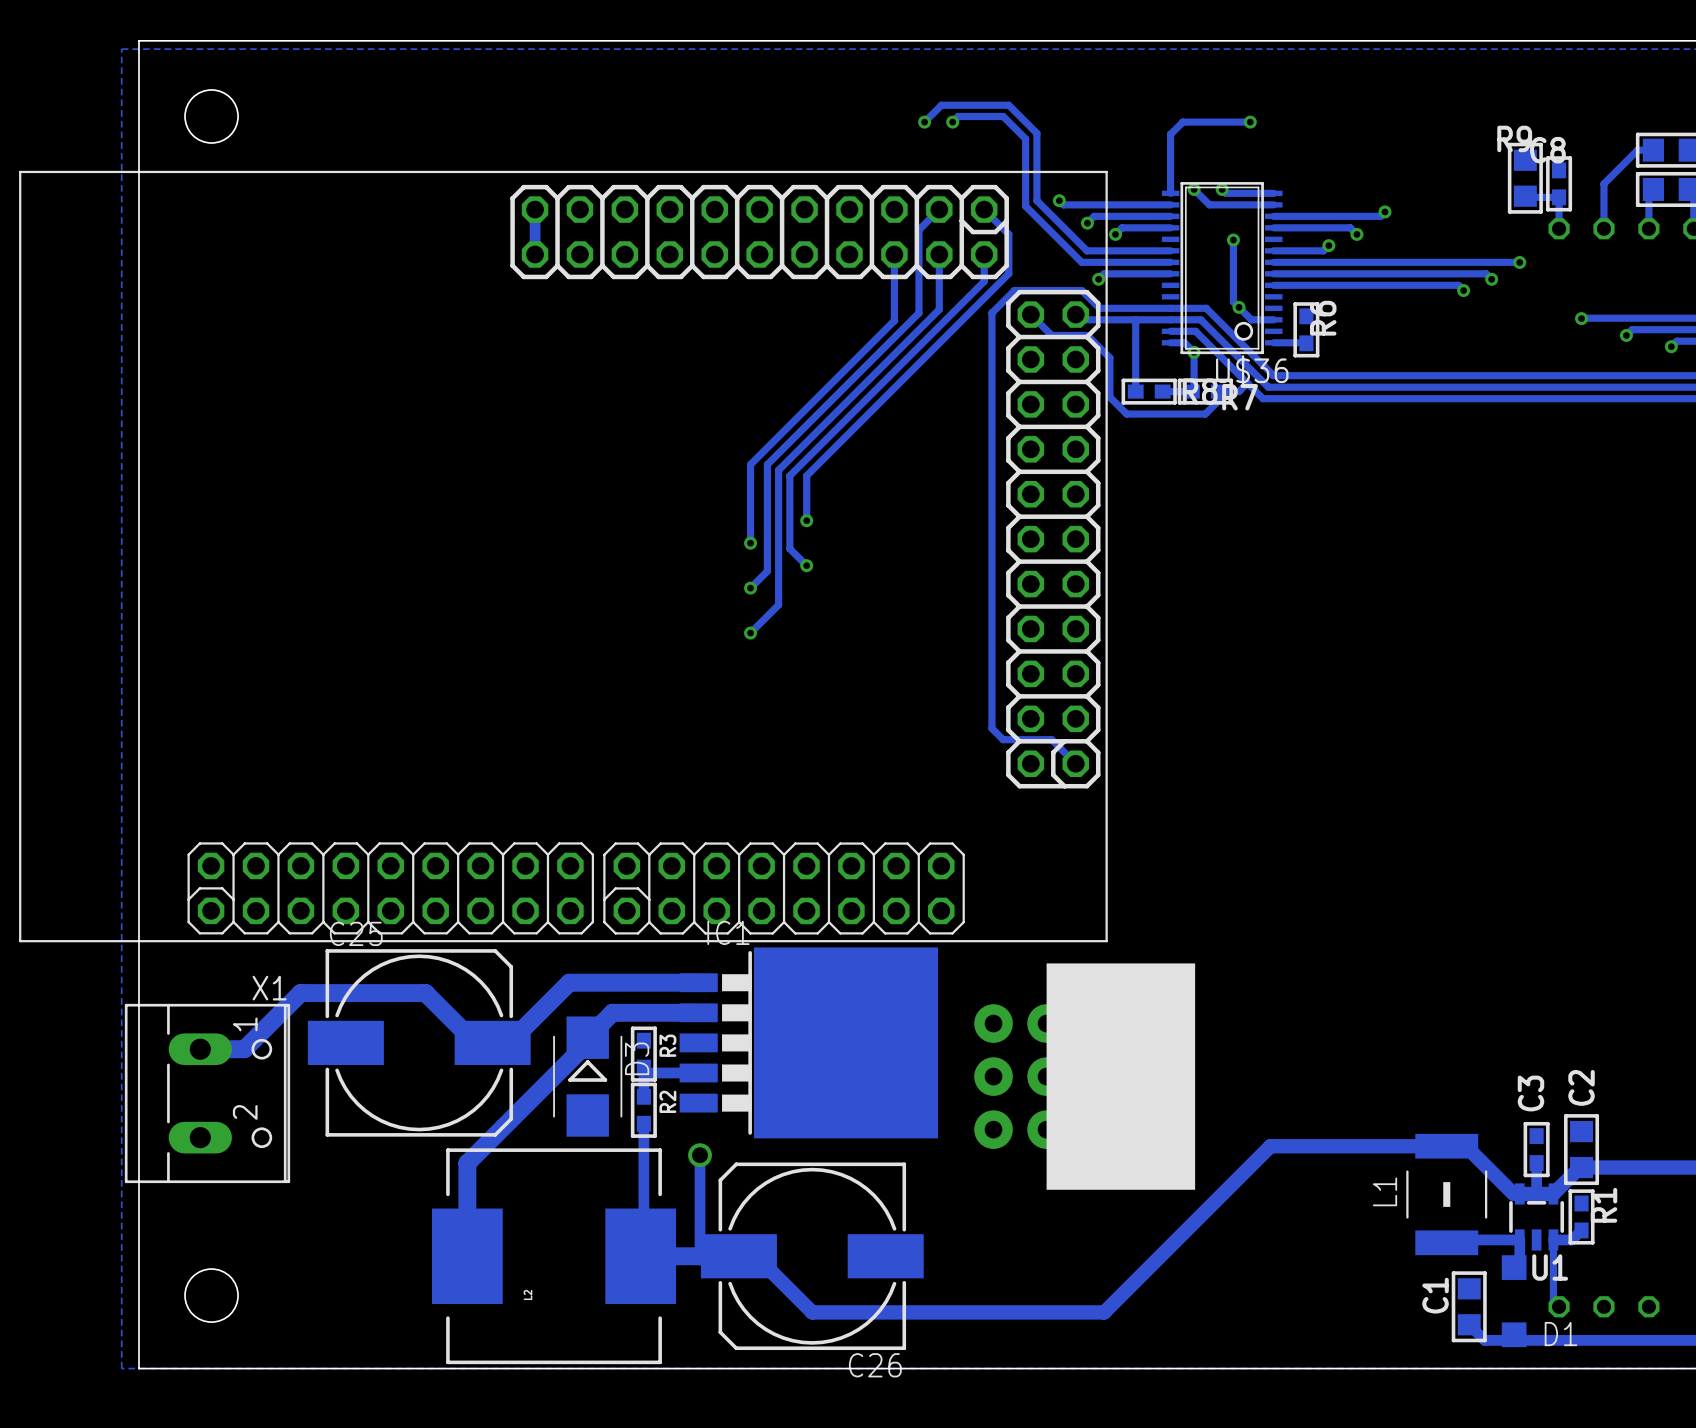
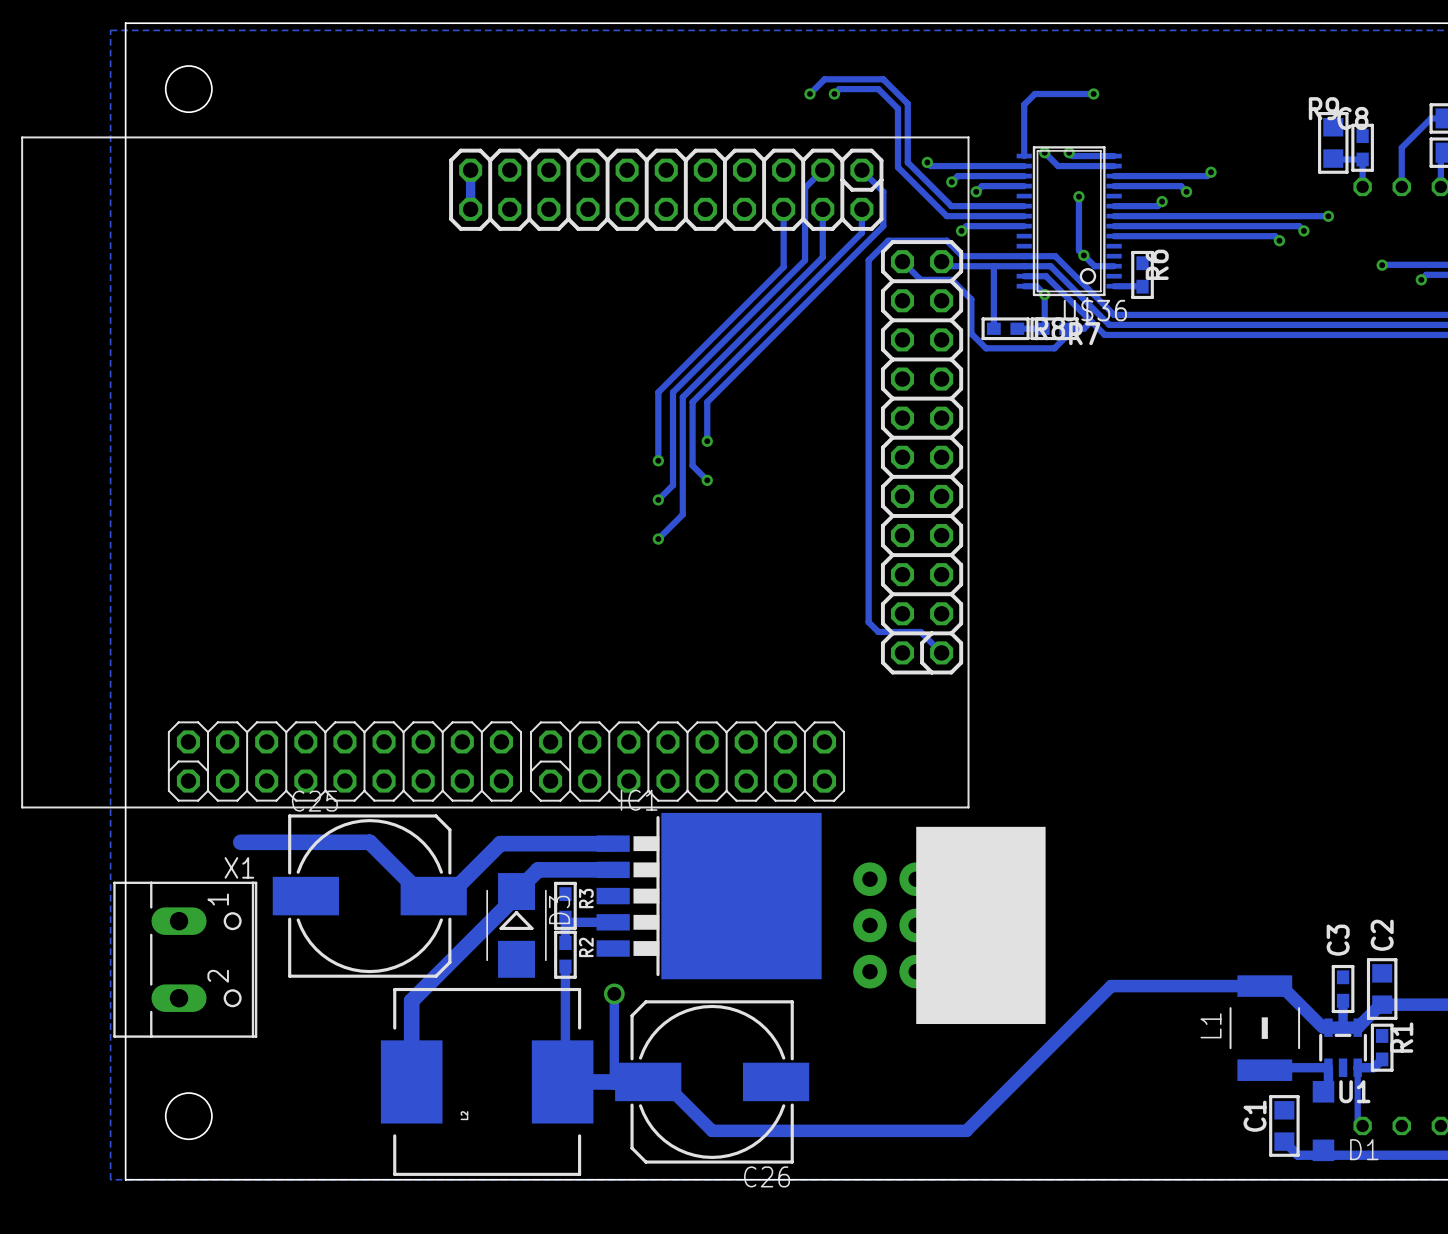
track: (492, 1042) (475, 1042) (425, 993) (300, 993) (244, 1049) (200, 1049) -> (433, 896) (428, 900) (369, 842) (240, 842)
X1 position: (207, 1093) -> (185, 959)

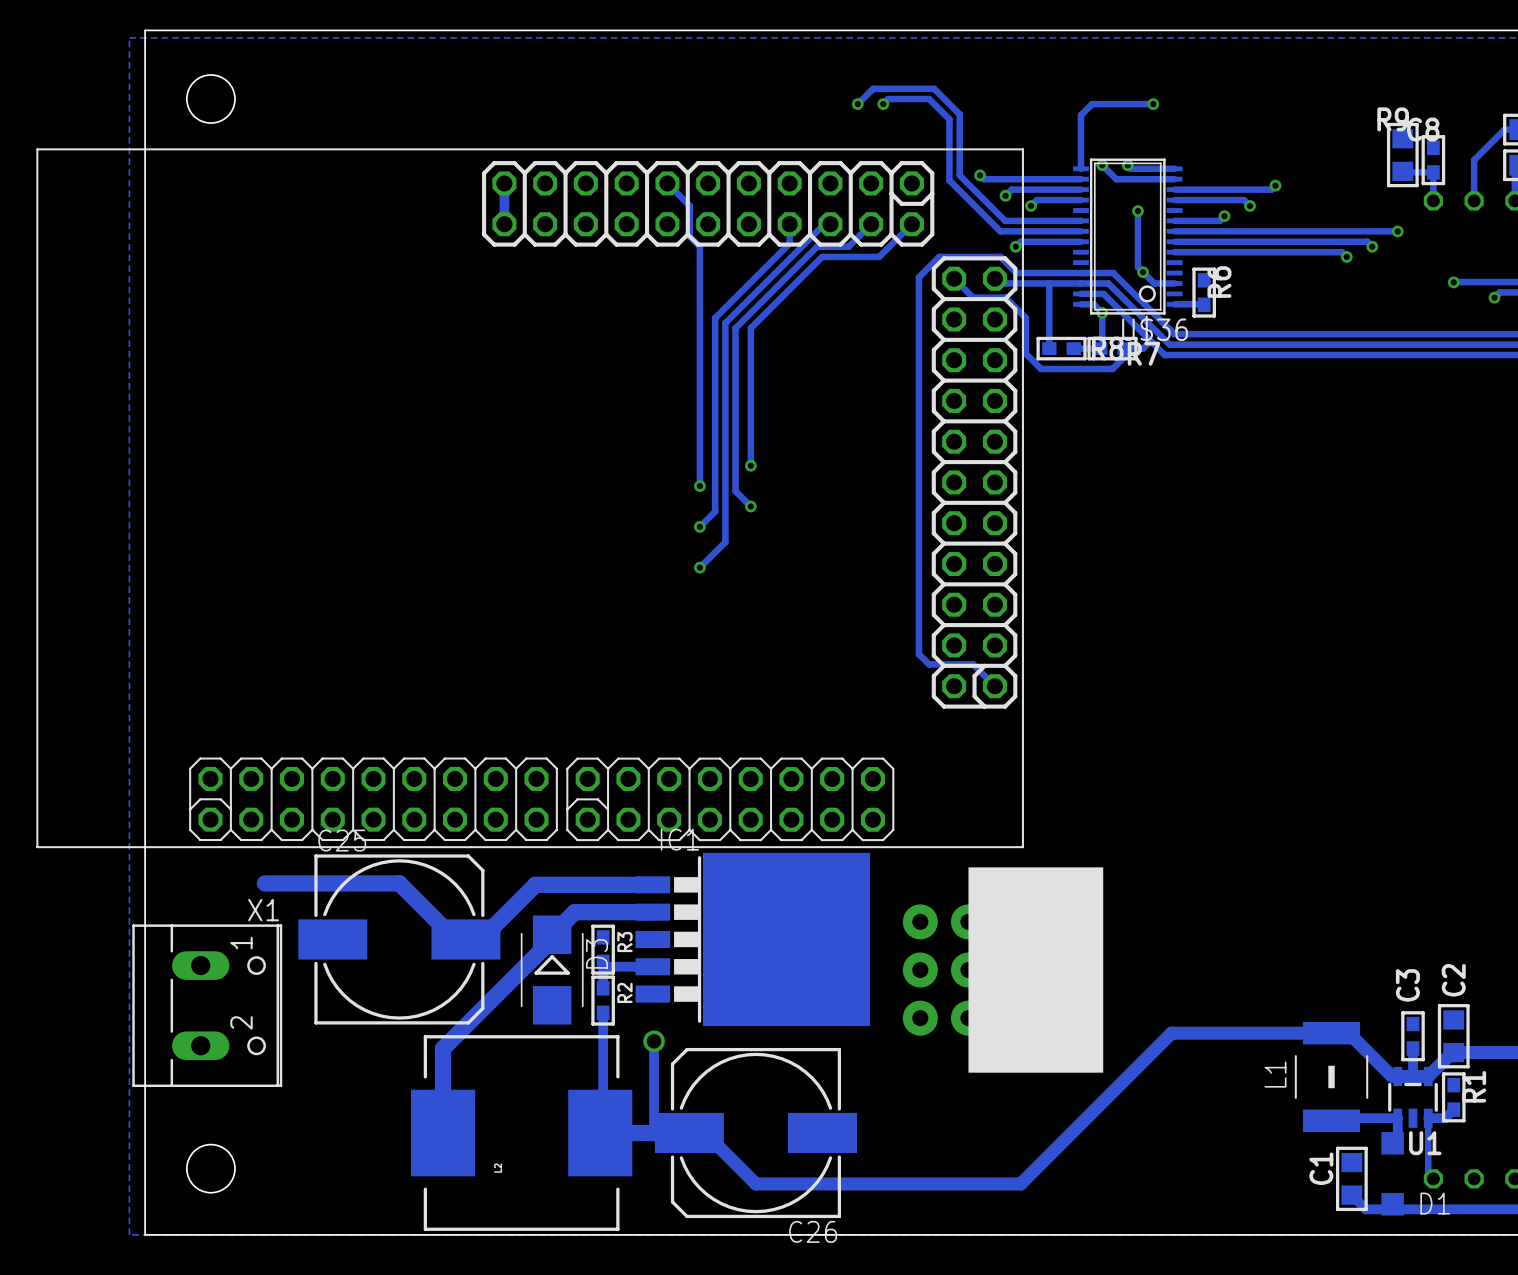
track: none -> (667, 183) (689, 205) (689, 236) (699, 246) (699, 414)
track: (822, 170) (805, 187) (805, 260) (673, 392) -> (789, 224) (789, 243) (715, 318) (715, 414)
track: (861, 170) (883, 191) (883, 226) (707, 402) -> none
track: (783, 209) (783, 267) (658, 392) -> (830, 224) (824, 224) (725, 323) (725, 419)
track: (822, 209) (822, 257) (682, 397) -> (871, 224) (848, 246) (817, 246) (735, 328) (735, 425)
track: (861, 209) (861, 232) (692, 402) -> (911, 224) (879, 256) (822, 256) (750, 328) (750, 425)

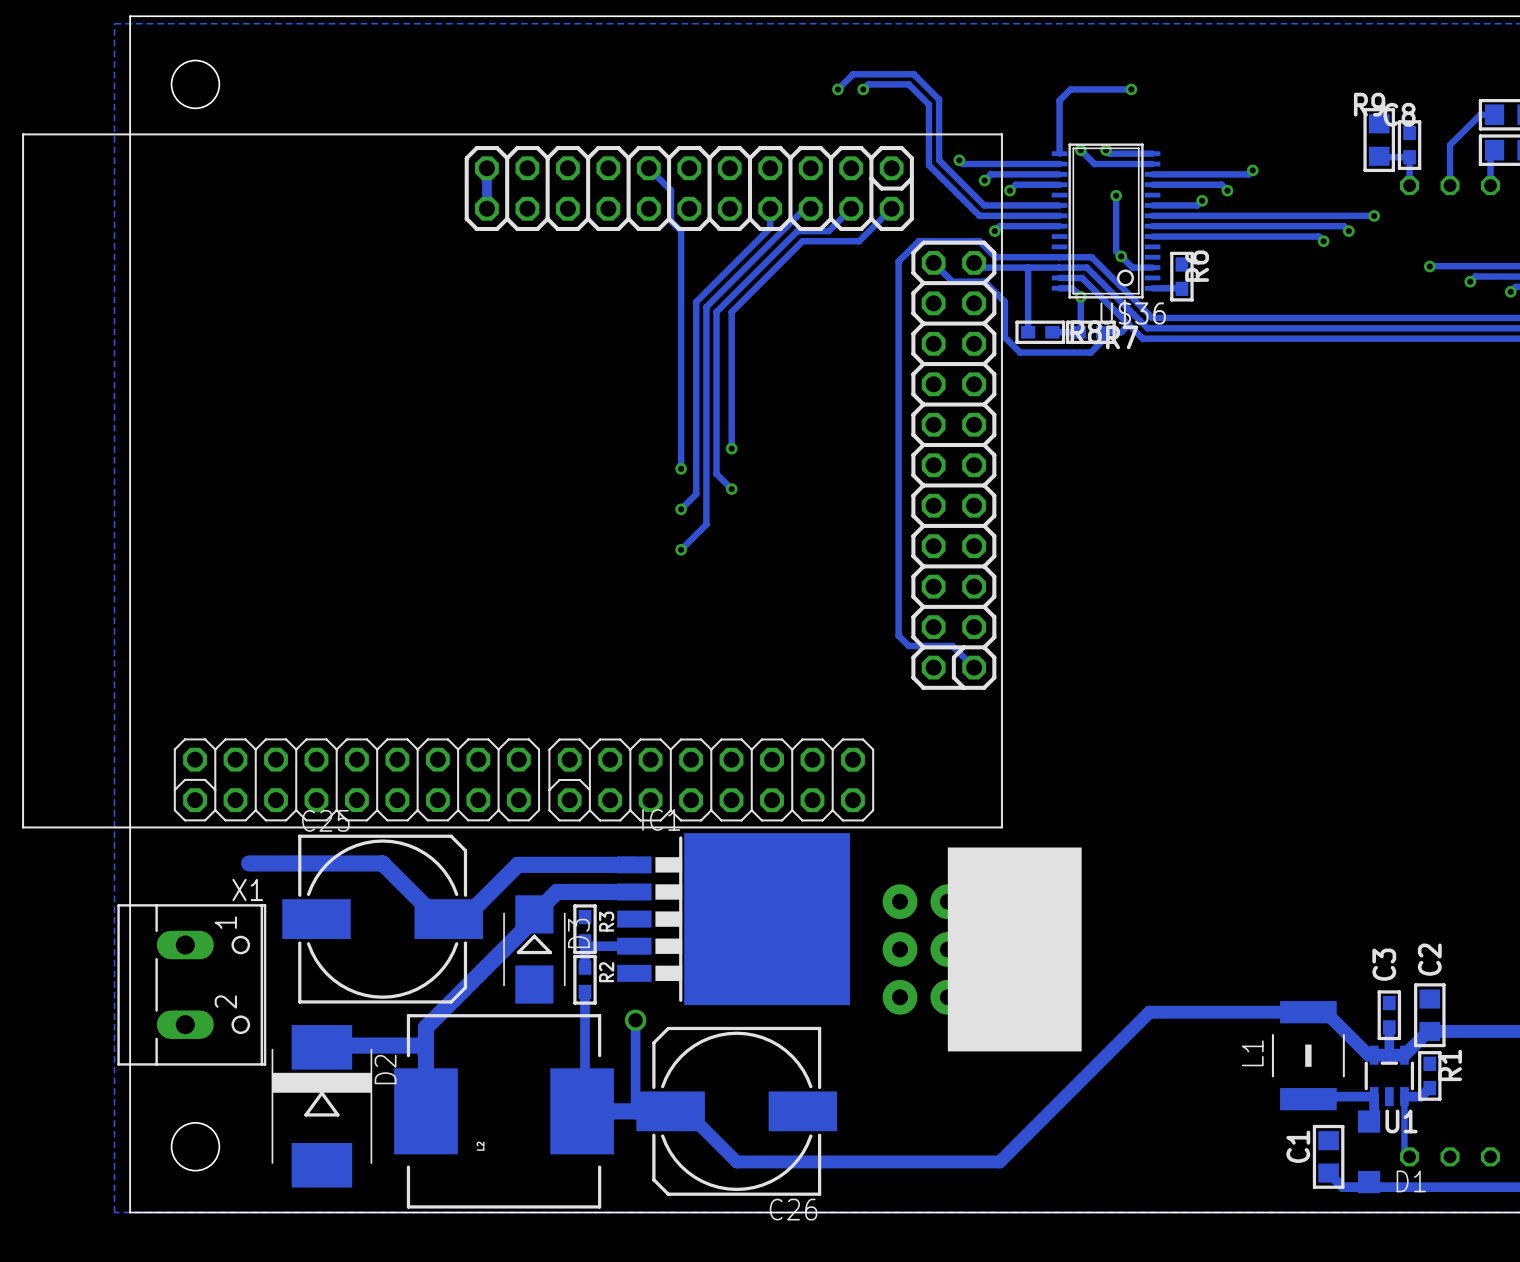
track: none -> (425, 1045) (333, 1045) (321, 1047)
D2: none -> (321, 1106)

